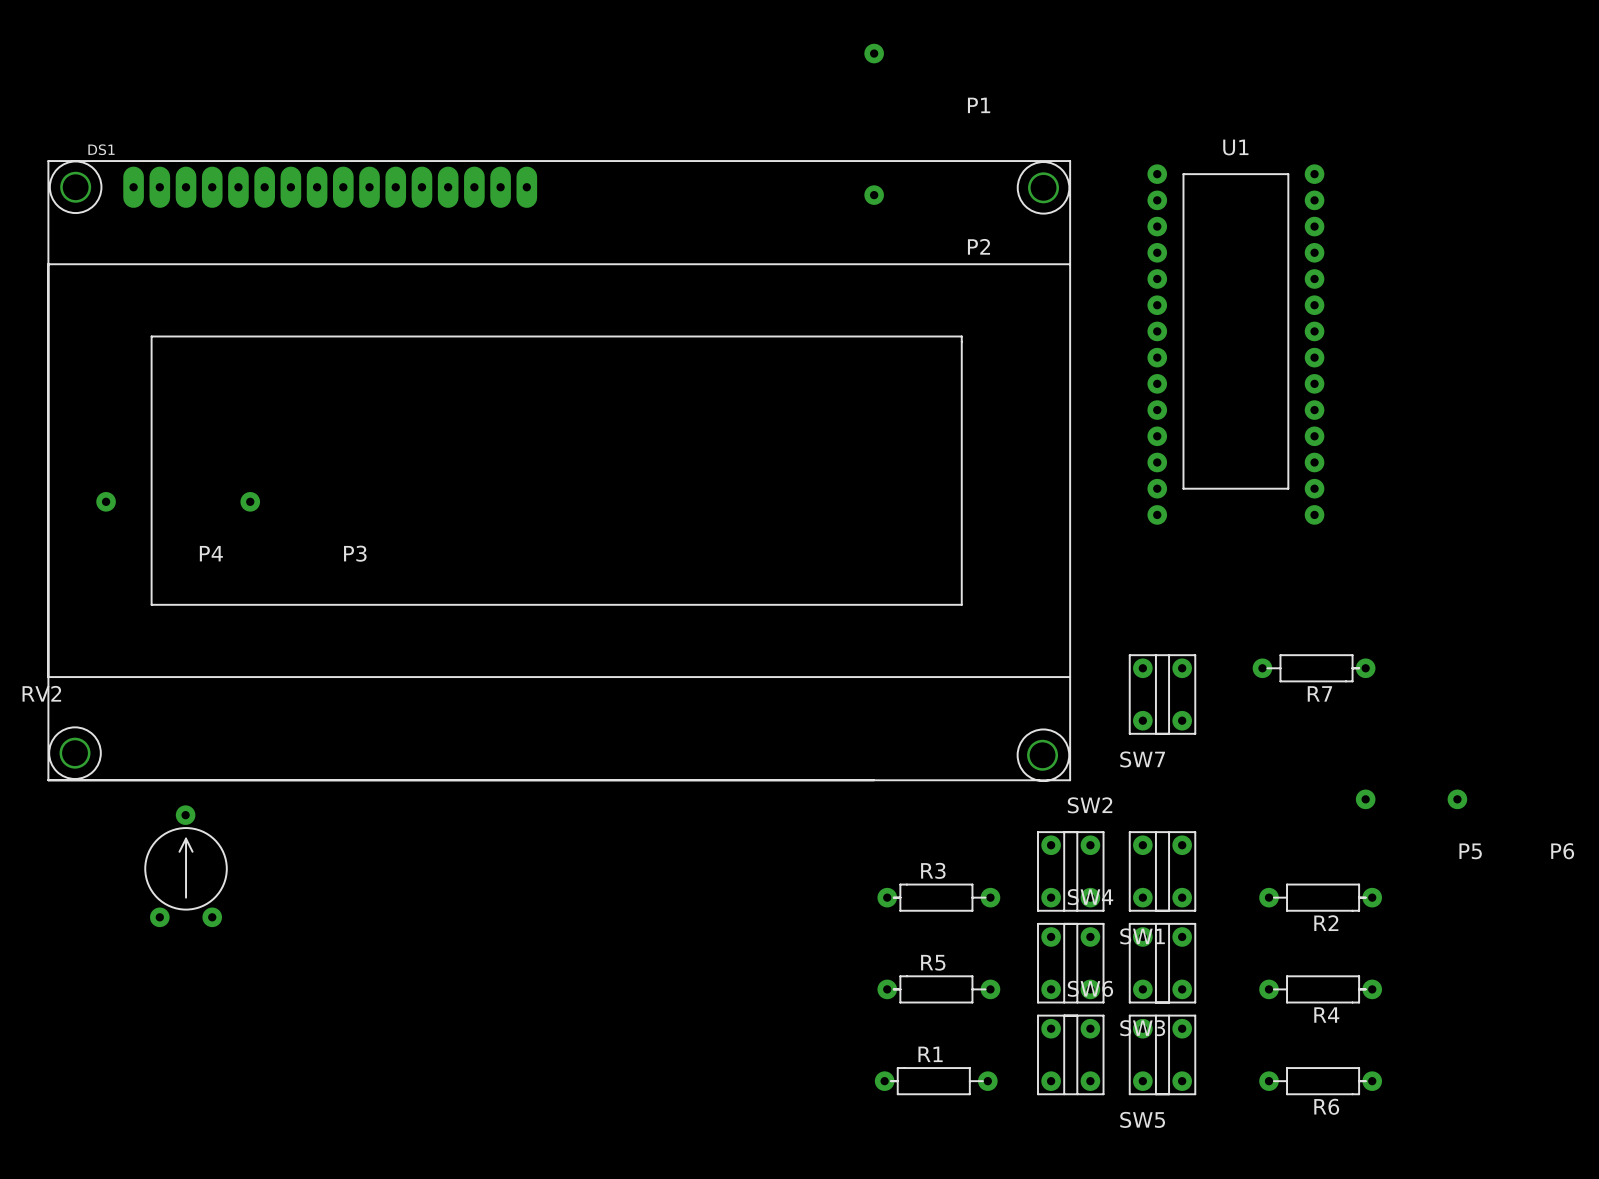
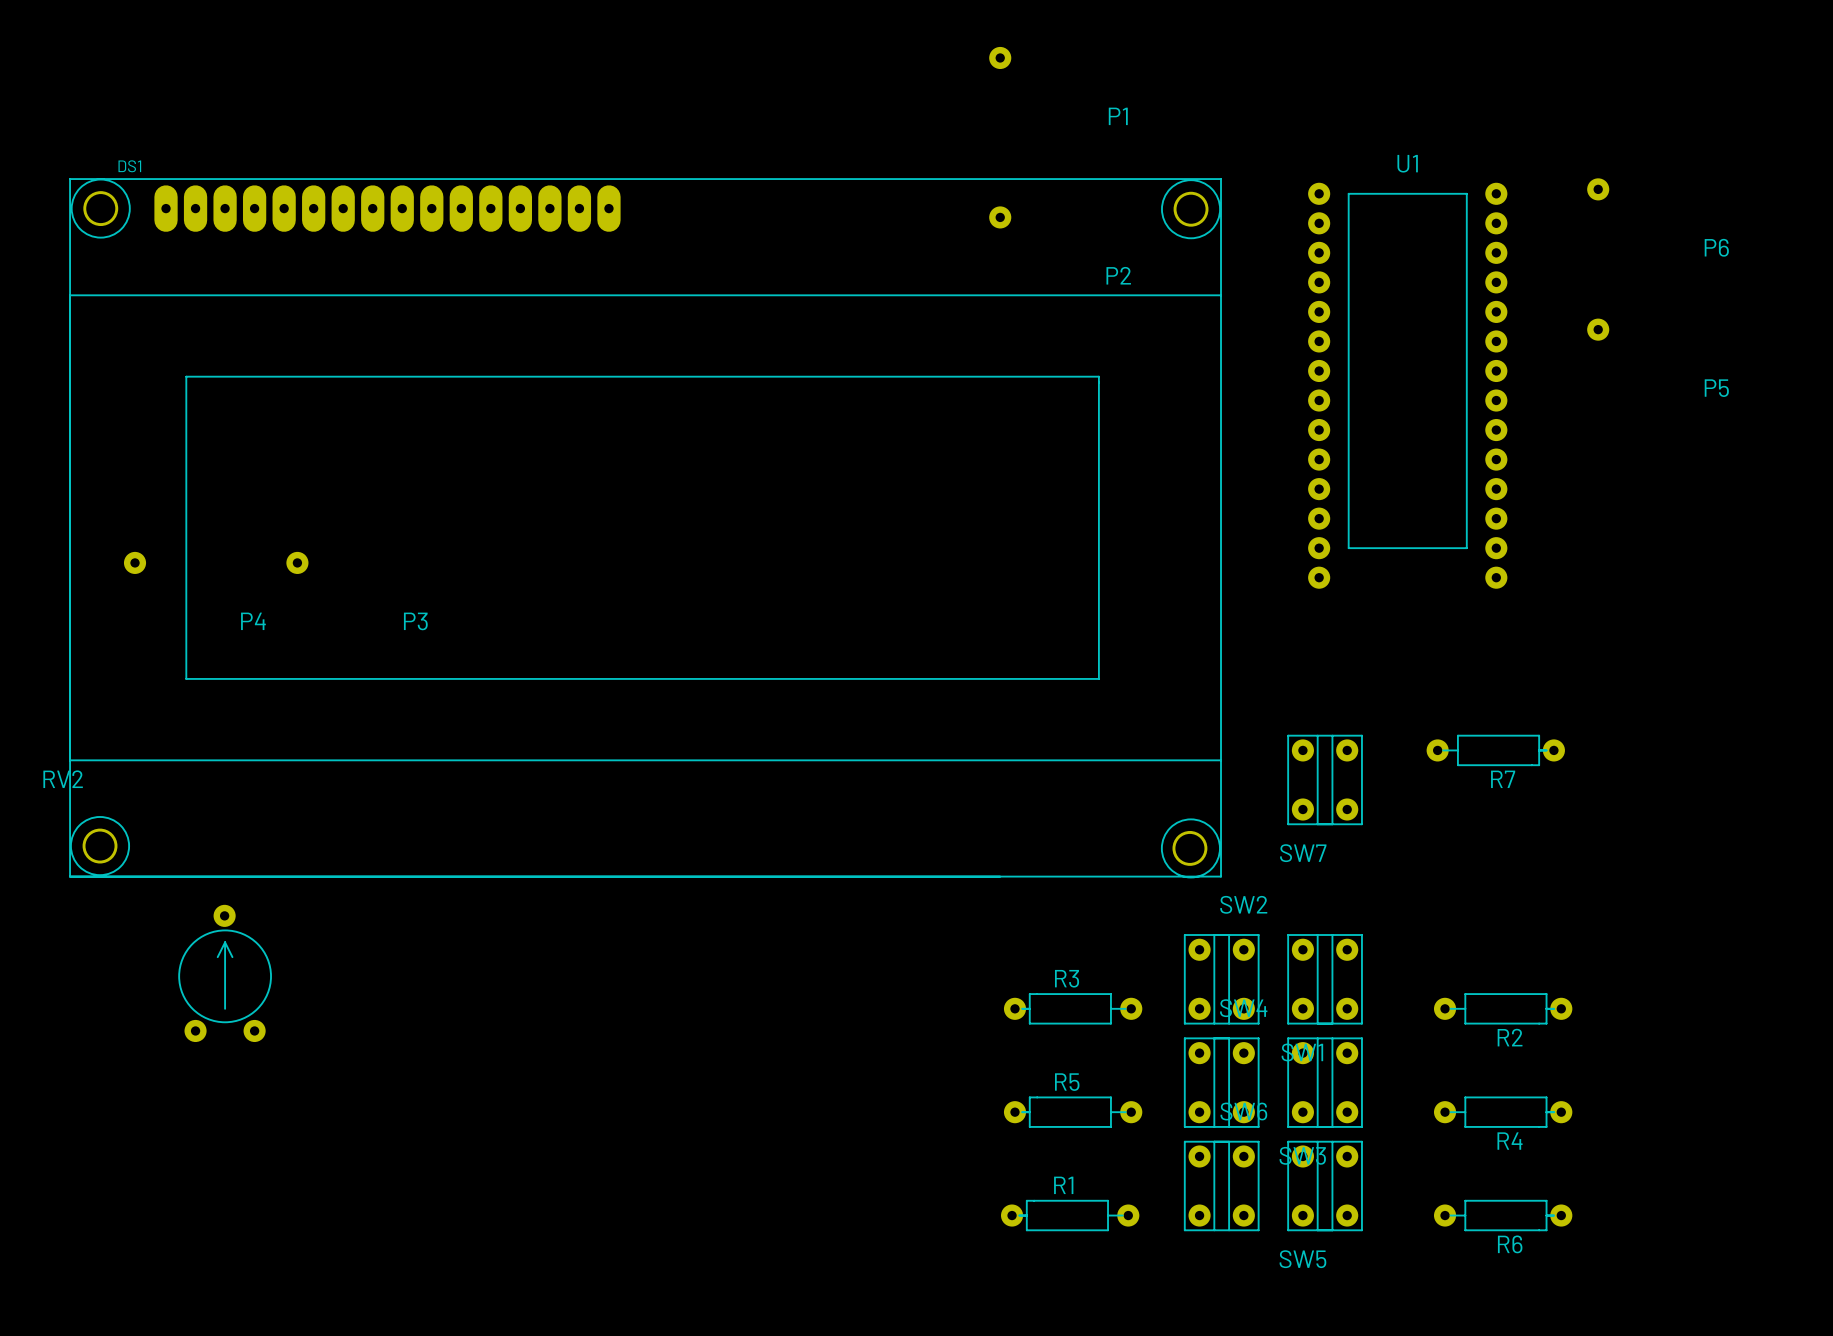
P5 position: (1365, 799) -> (1598, 329)
P6 position: (1457, 799) -> (1598, 189)

